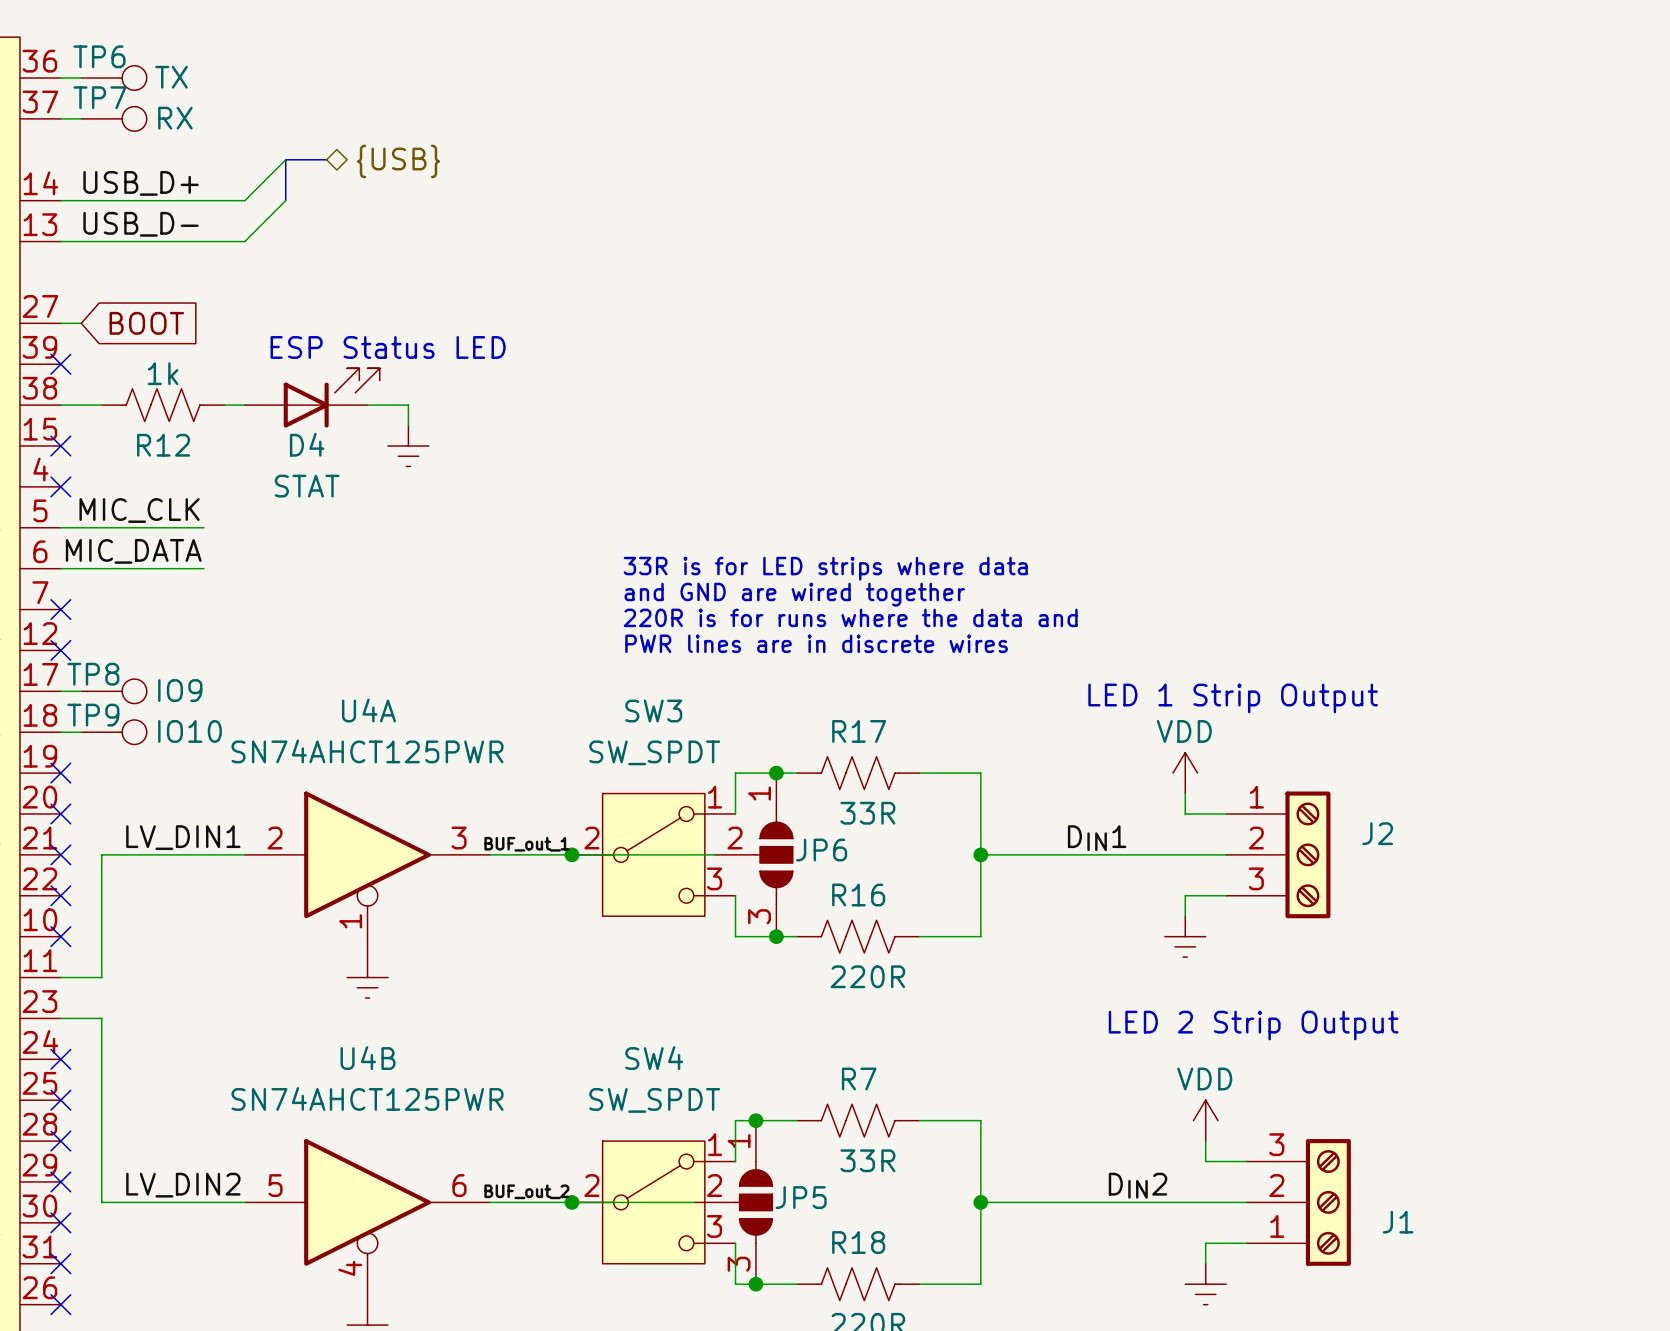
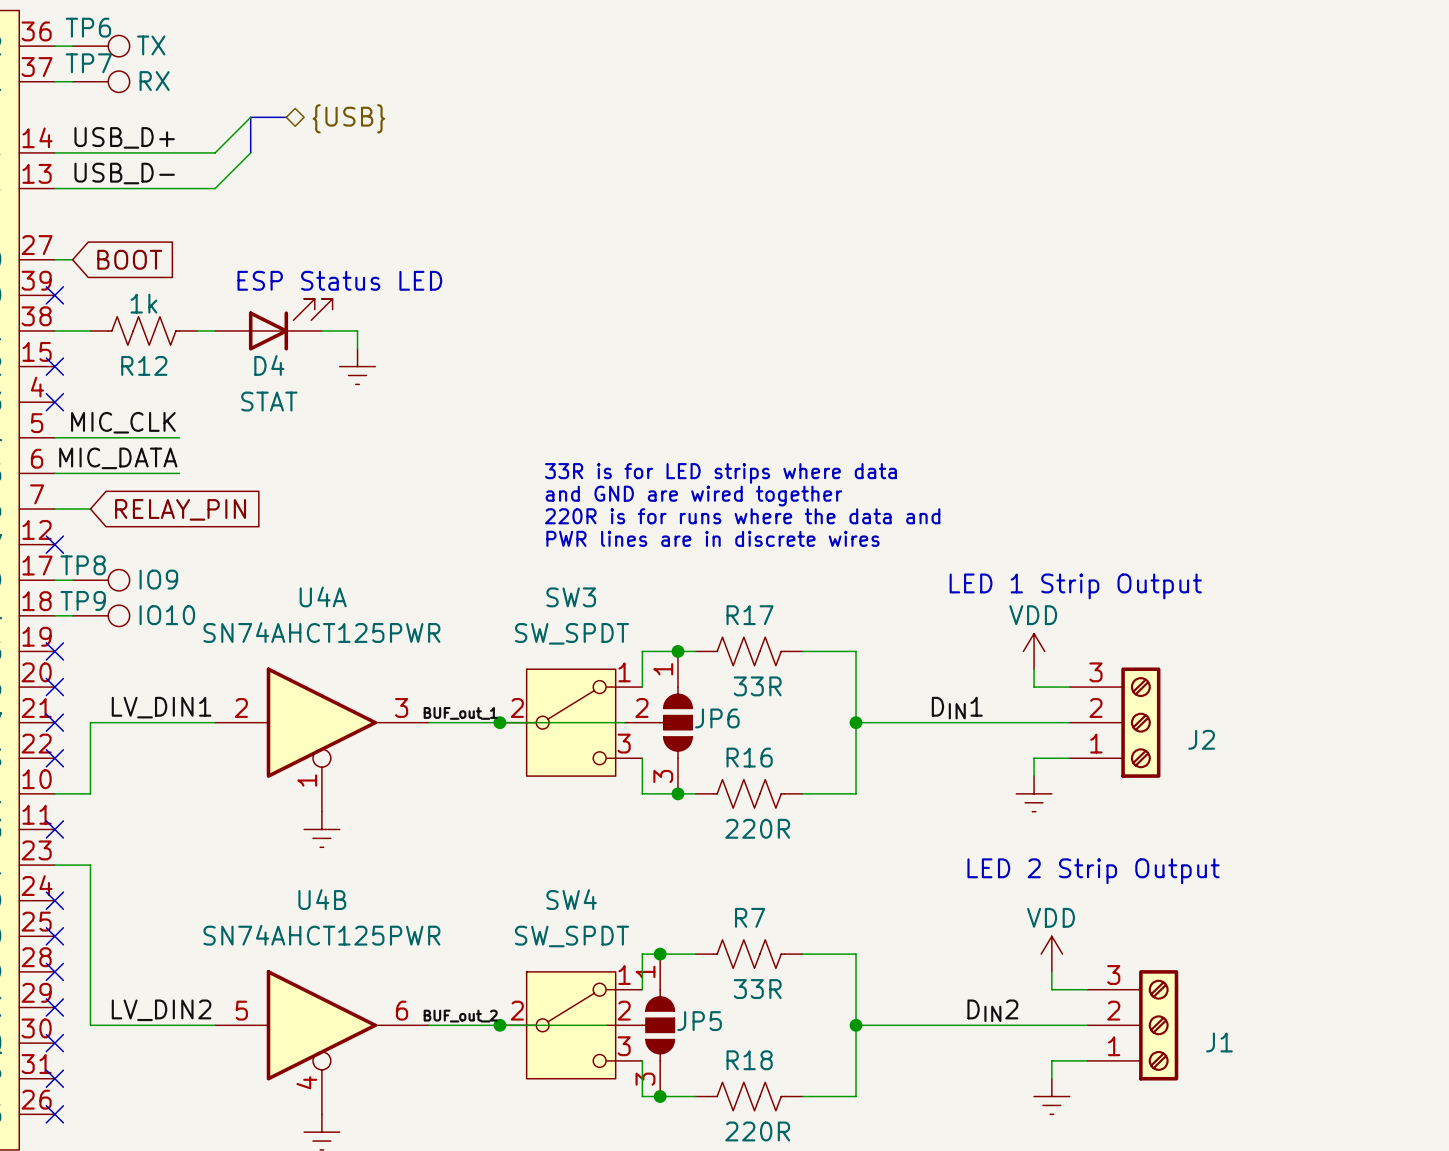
wire: none -> (54, 509) (90, 509)
no-connect mark: (60, 609) -> none
global label: none -> RELAY_PIN (180, 509)
J2 flip: as is (1307, 854) -> up-down (1140, 722)
no-connect mark position: (60, 936) -> (54, 829)
wire: (101, 936) (101, 977) (60, 977) -> (90, 793) (54, 793)

